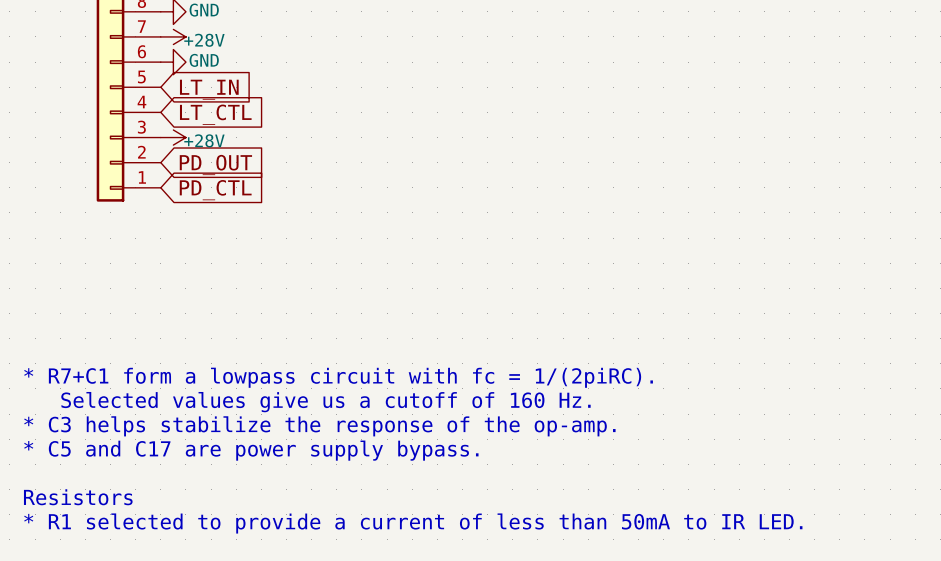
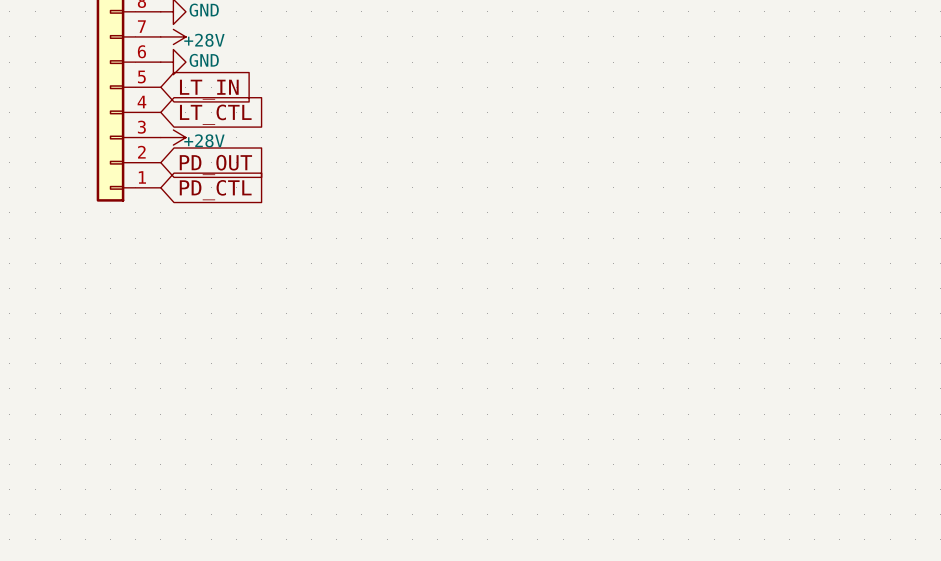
text: * R7+C1 form a lowpass circuit with fc = 1/(2piRC). (338, 377) -> none
text: Selected values give us a cutoff of 160 Hz. (325, 402) -> none
text: * C3 helps stabilize the response of the op-amp. (319, 426) -> none
text: * C5 and C17 are power supply bypass. (251, 450) -> none
text: Resistors (78, 497) -> none
text: * R1 selected to provide a current of less than 50mA to IR LED. (413, 523) -> none

